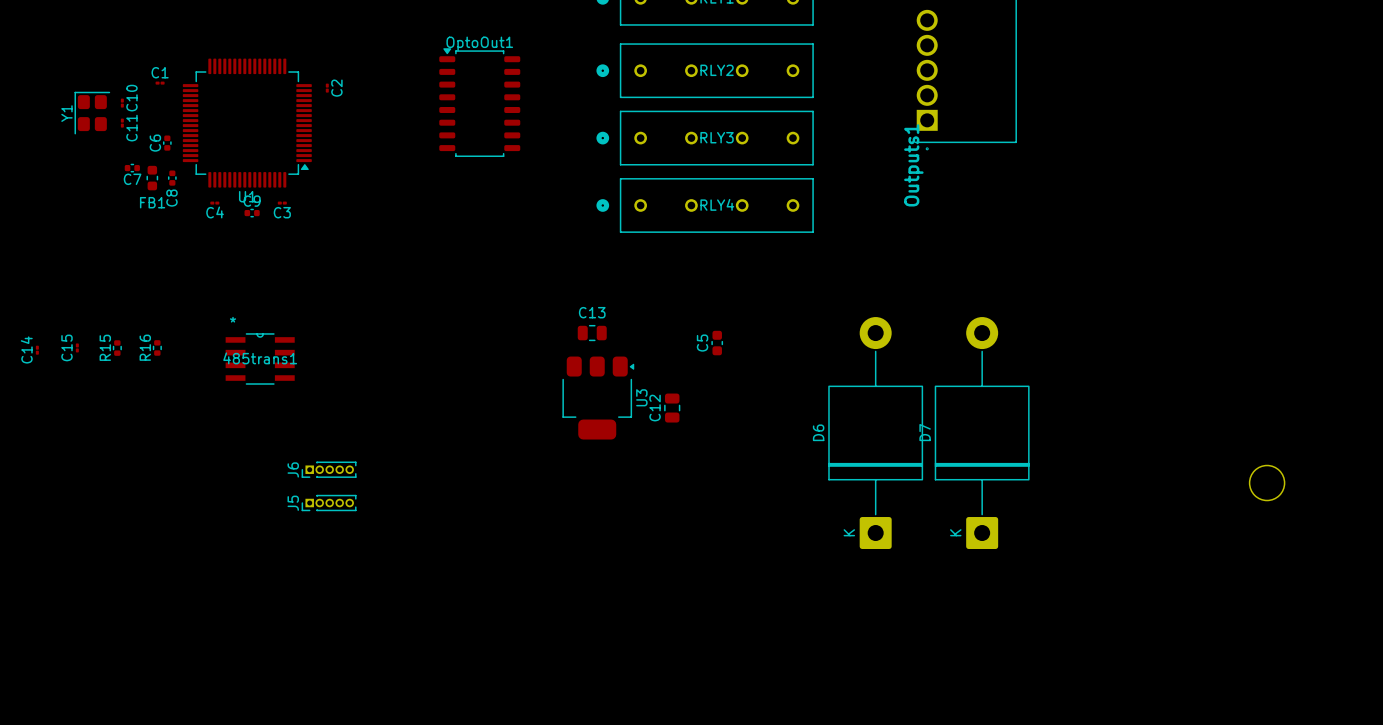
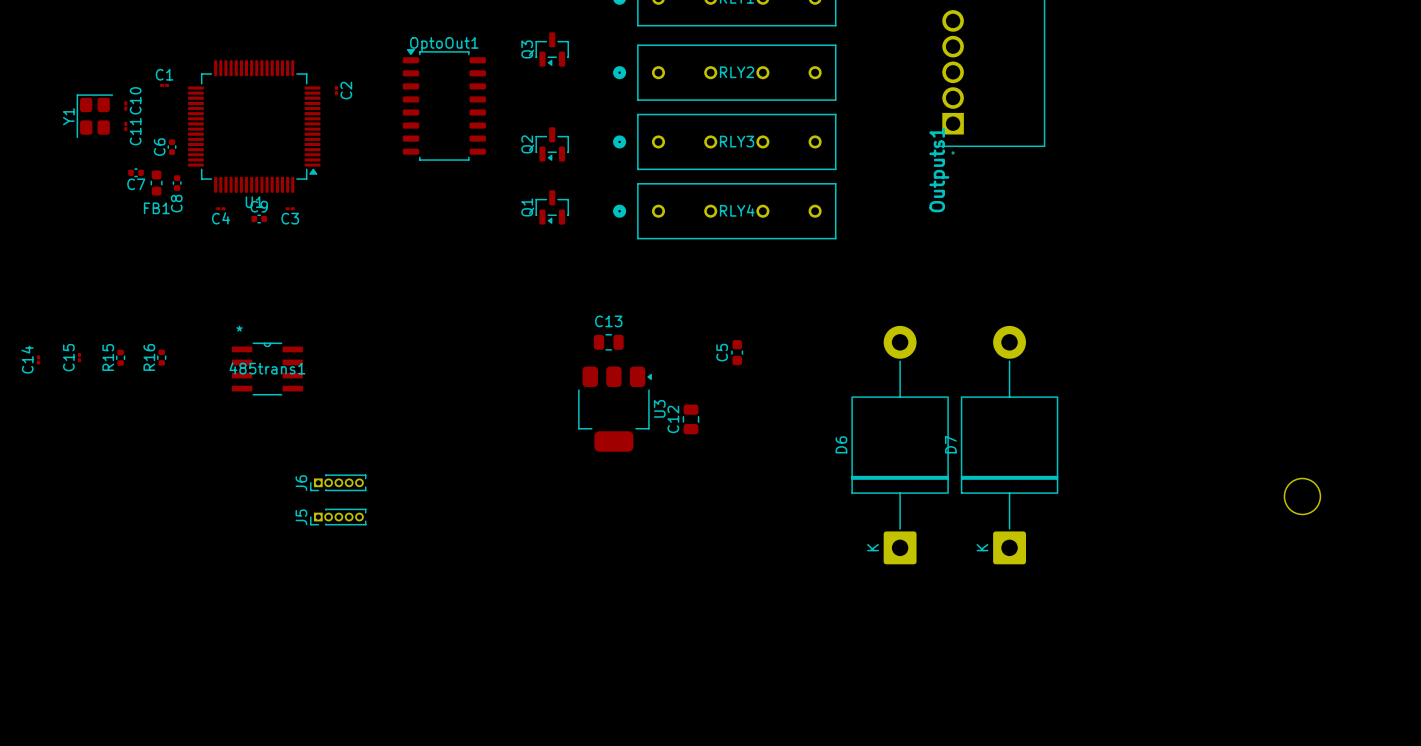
Q3: none -> (552, 49)
OptoOut1 position: (479, 102) -> (444, 104)
Q2: none -> (552, 144)
Q1: none -> (552, 207)

